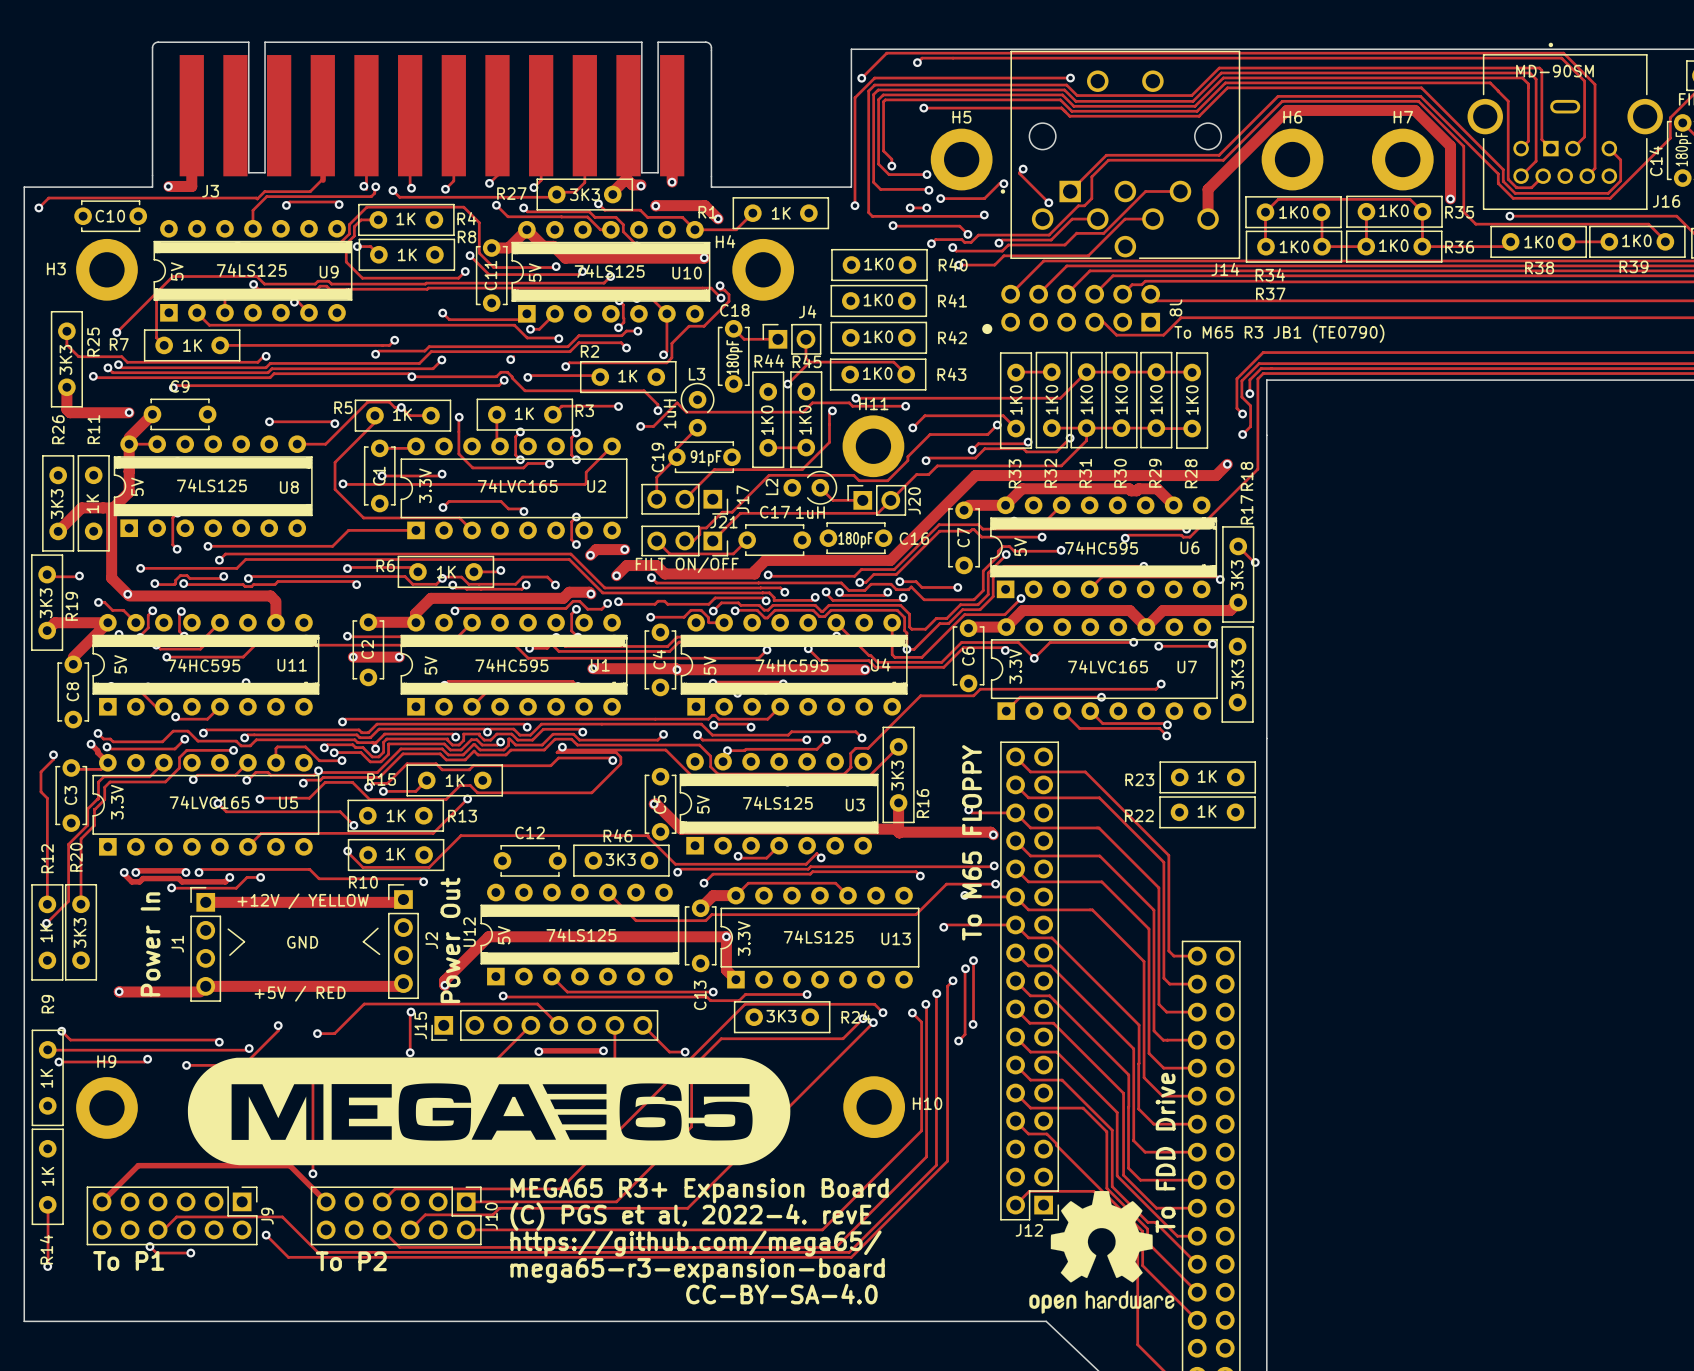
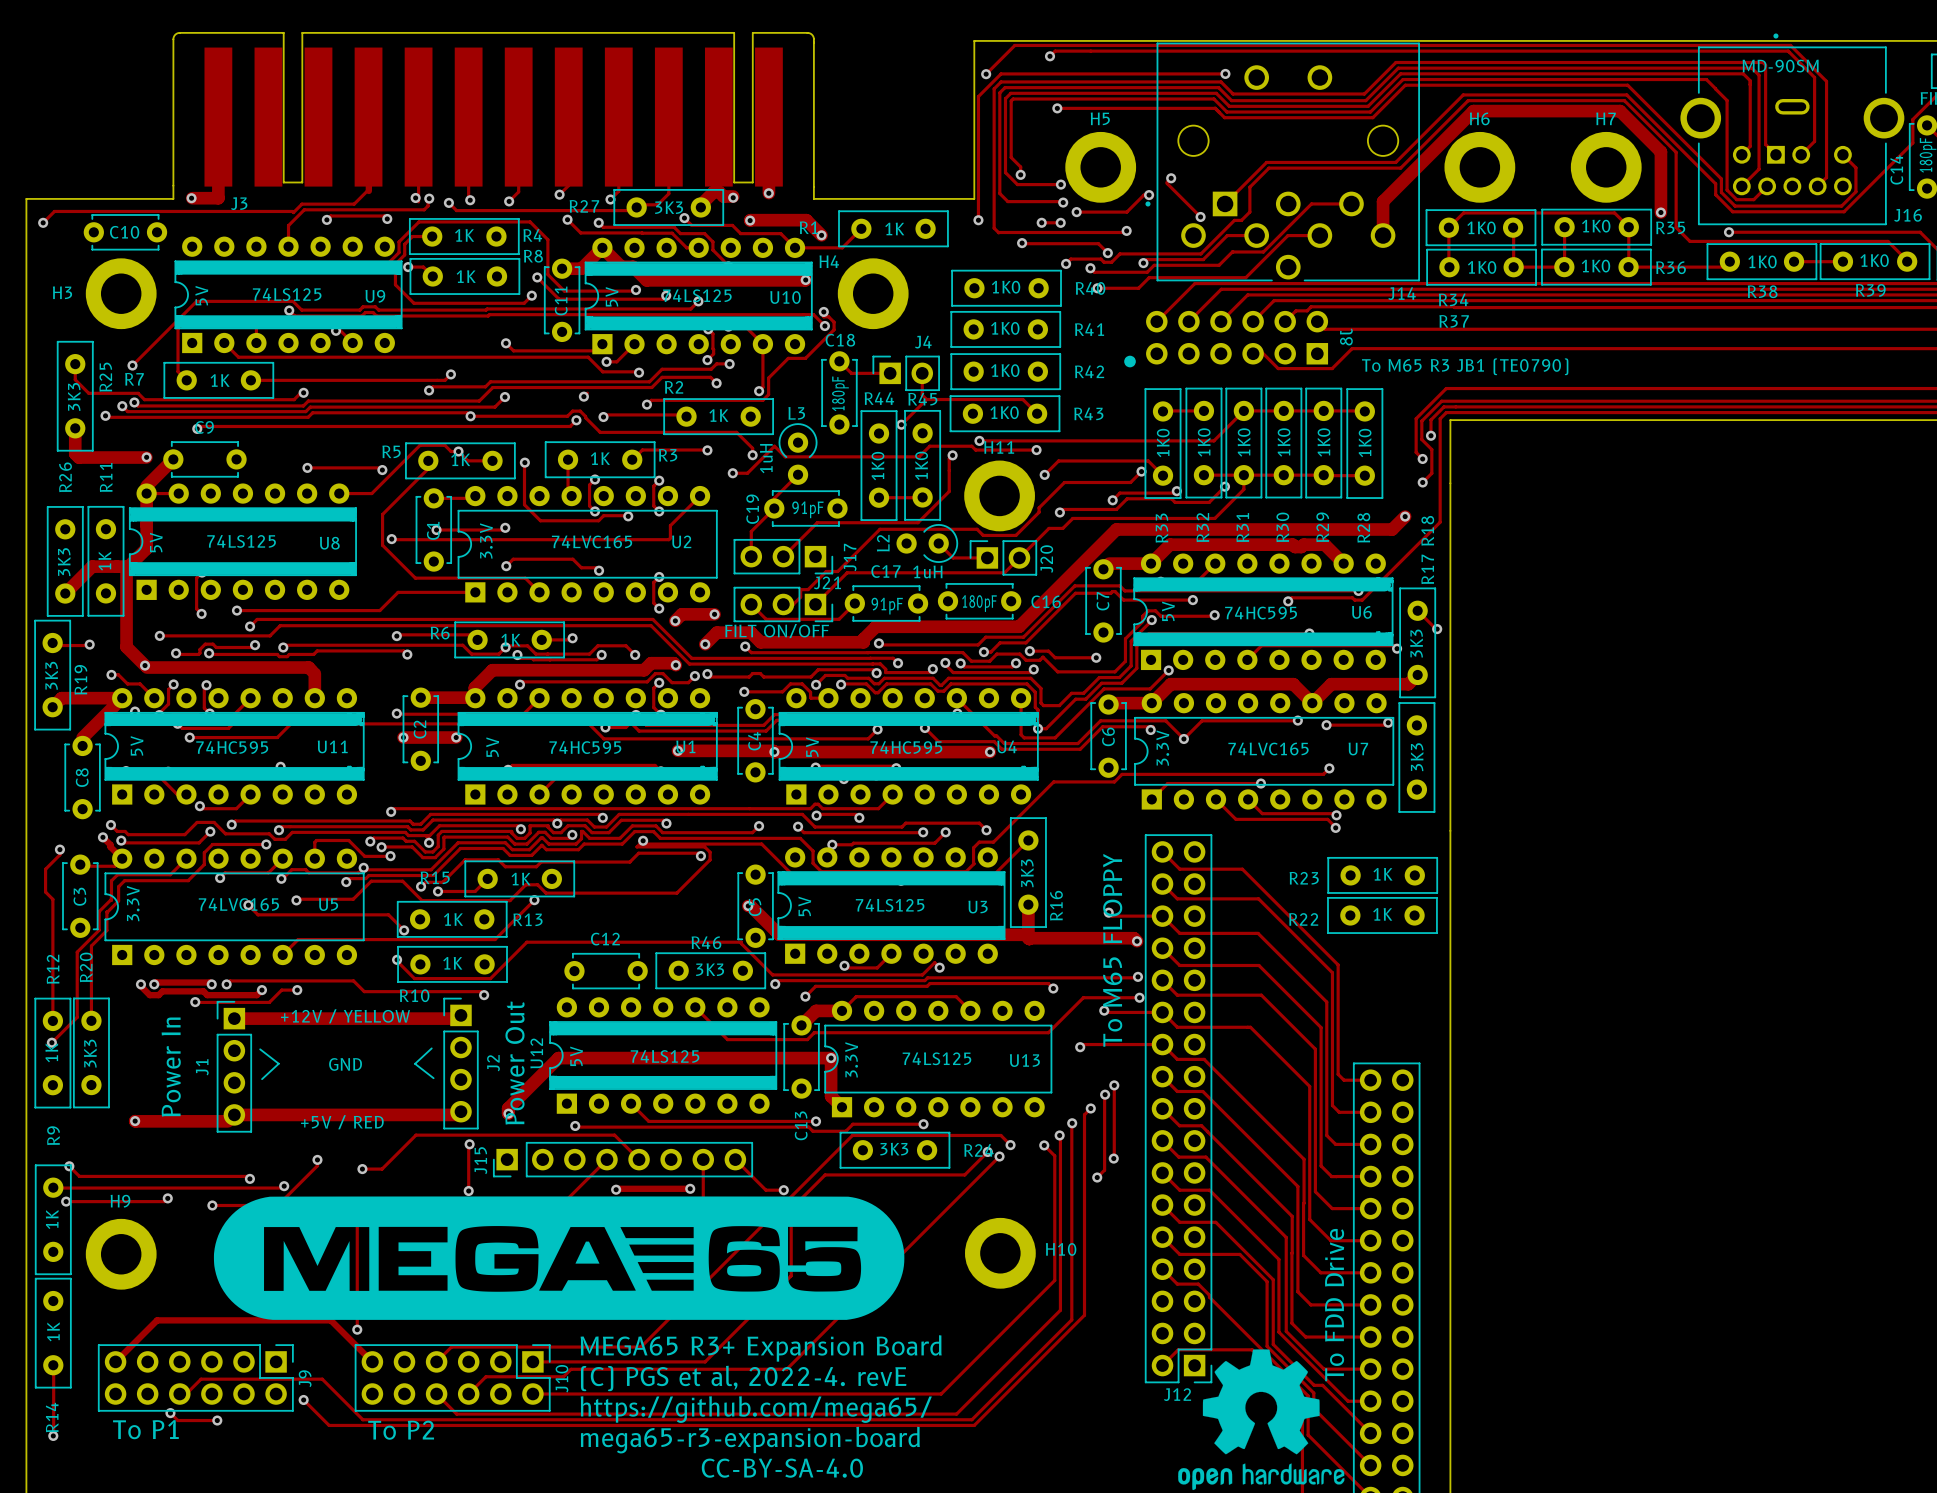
C17 value: none -> 91pF (887, 606)

